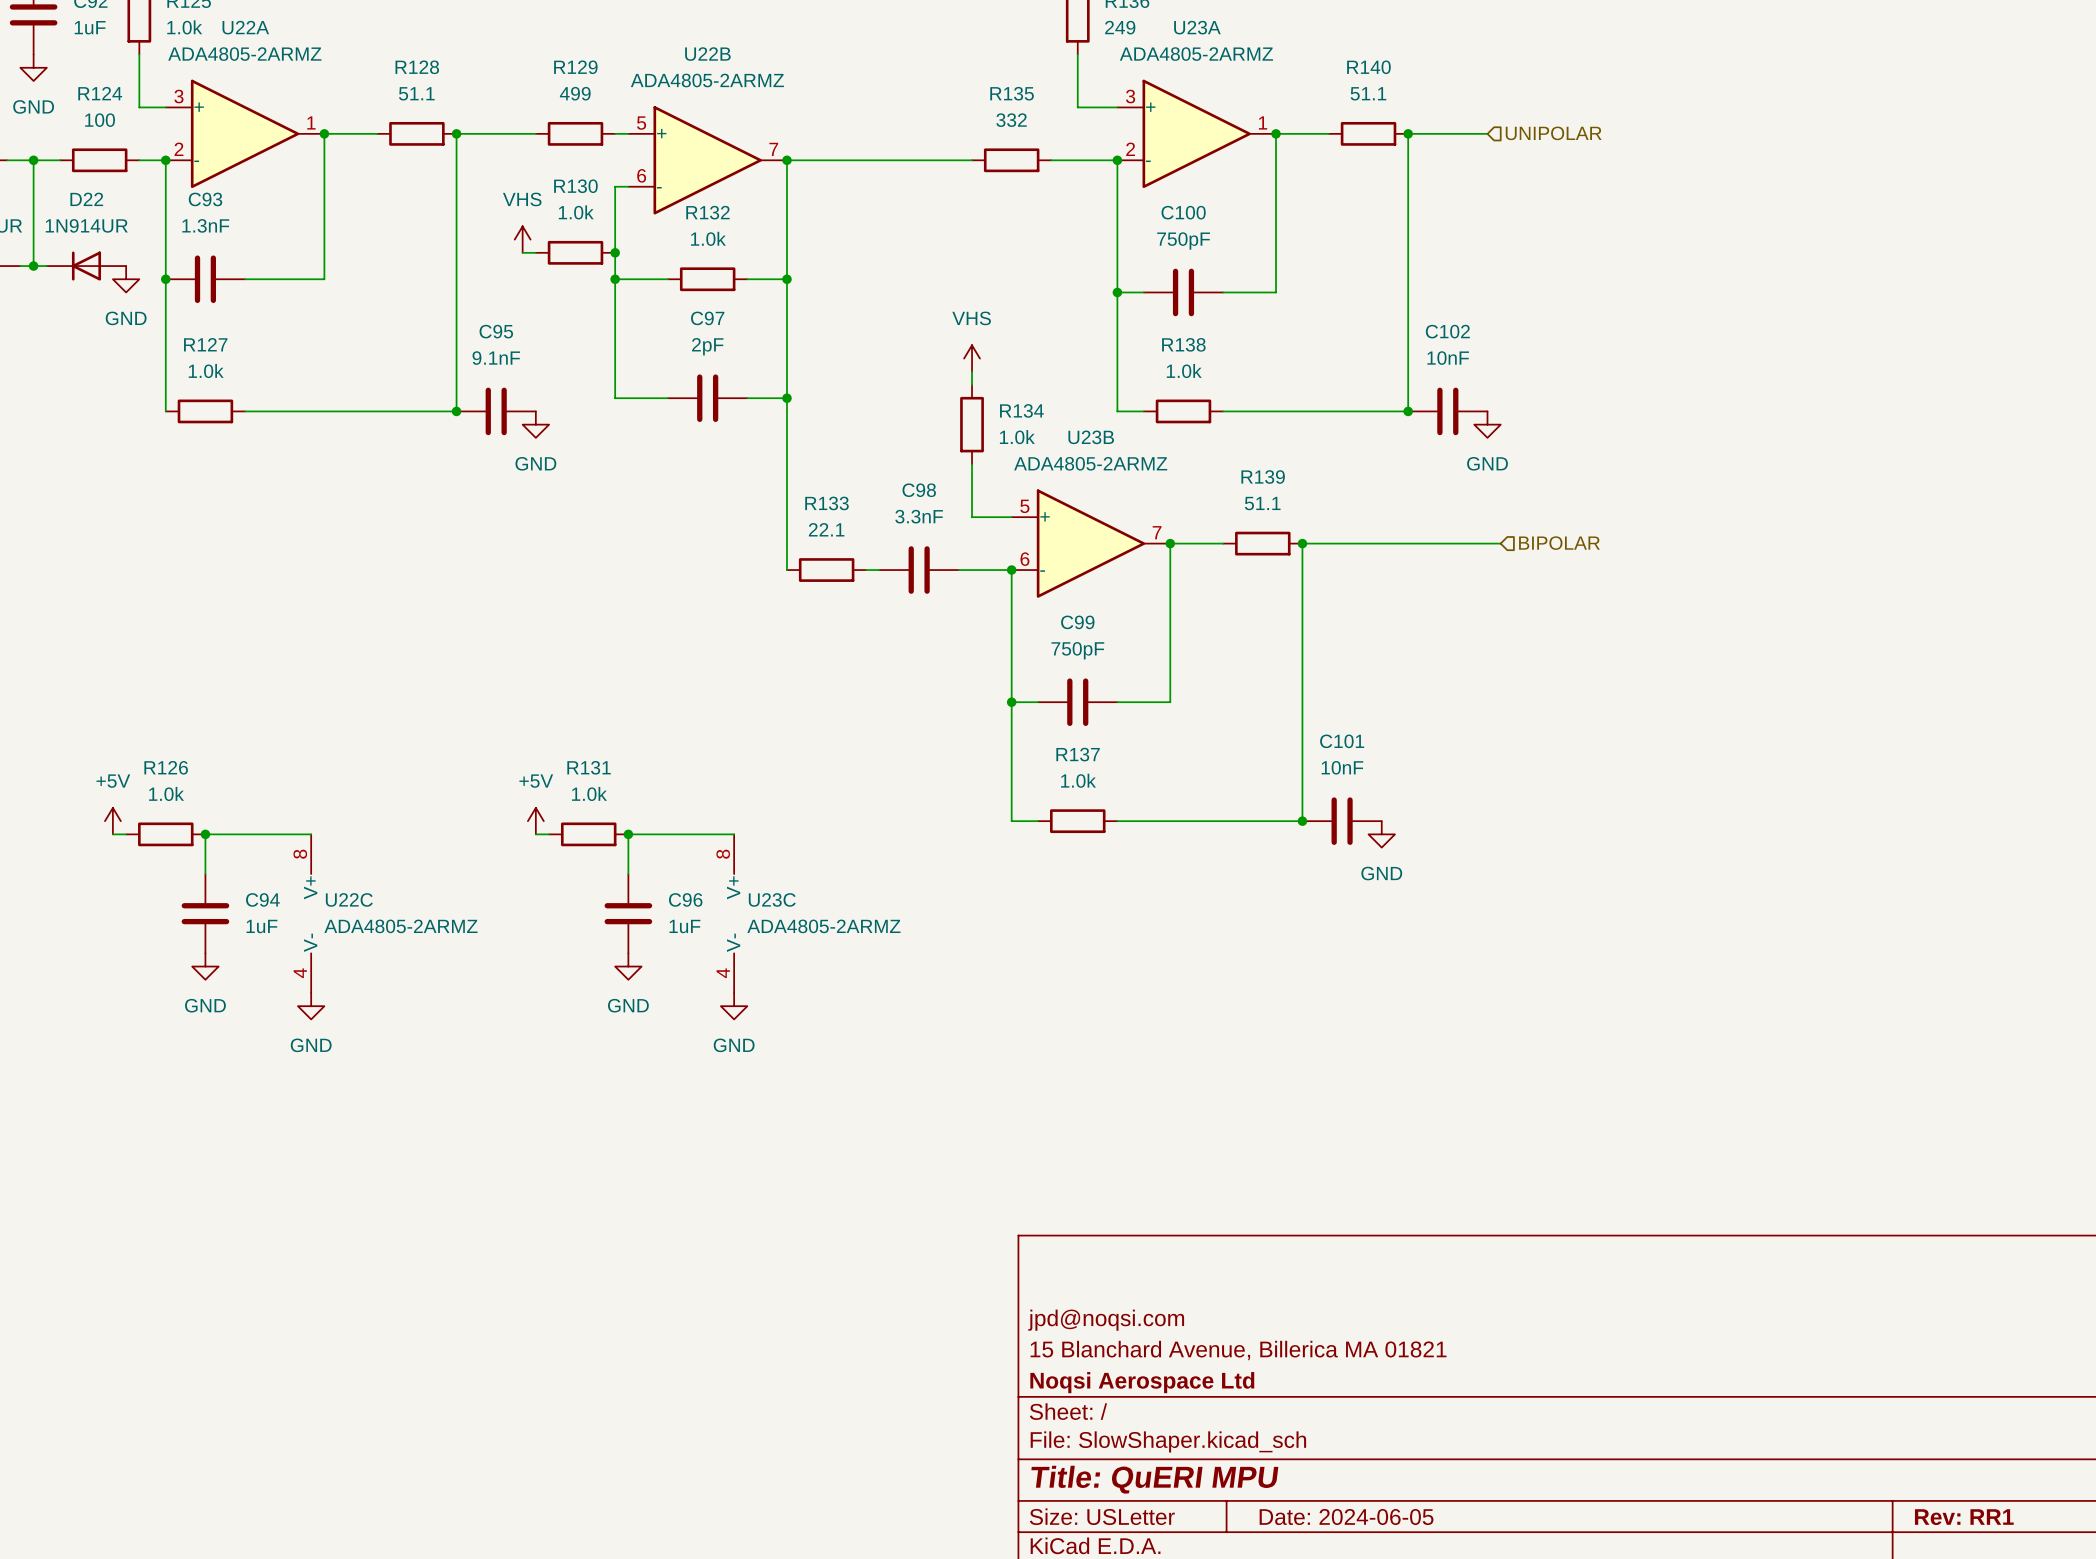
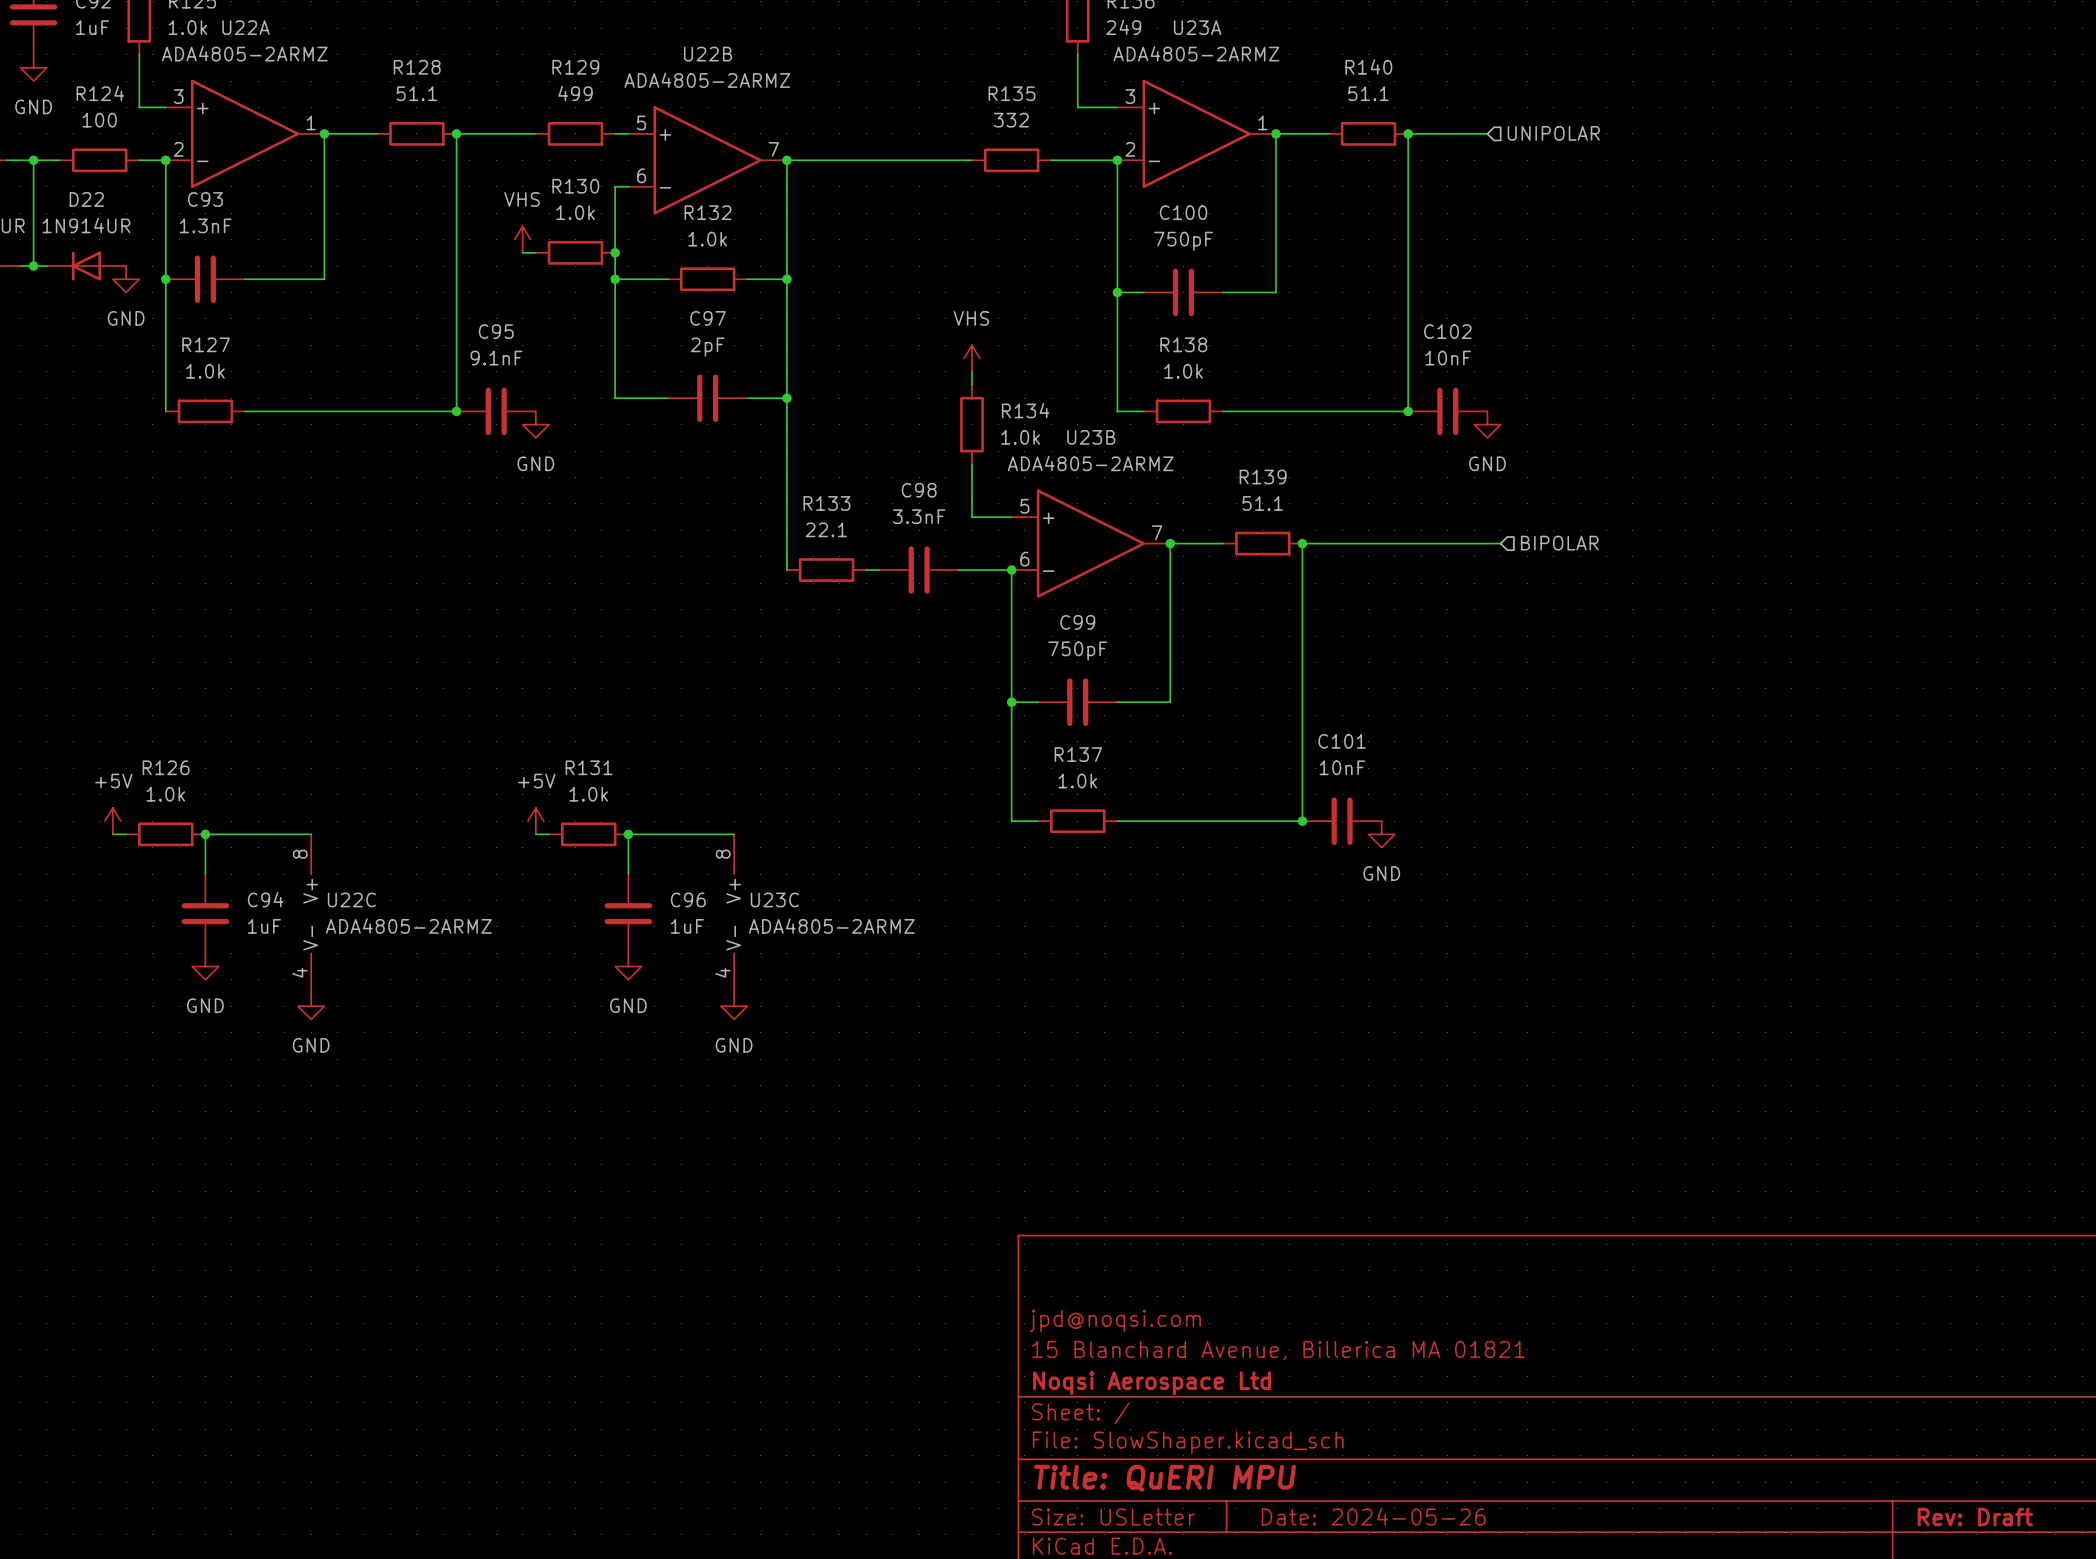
title block: Date: 2024-06-05 (1346, 1517) -> Date: 2024-05-26 (1373, 1516)
title block: Rev: RR1 (1964, 1517) -> Rev: Draft (1975, 1517)

